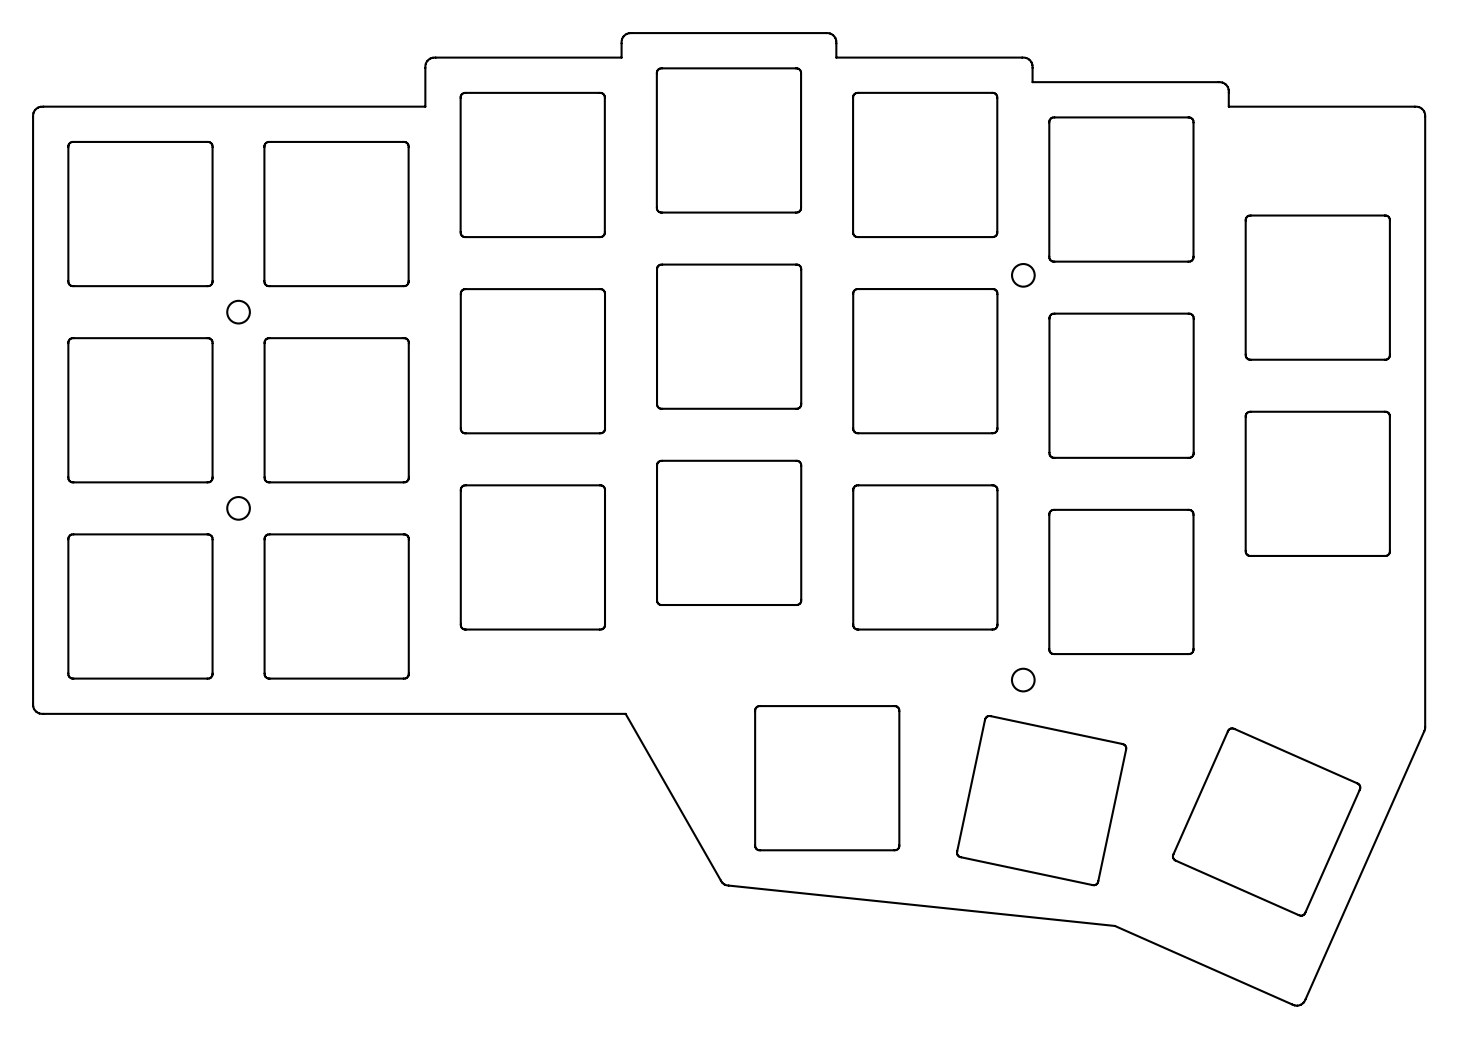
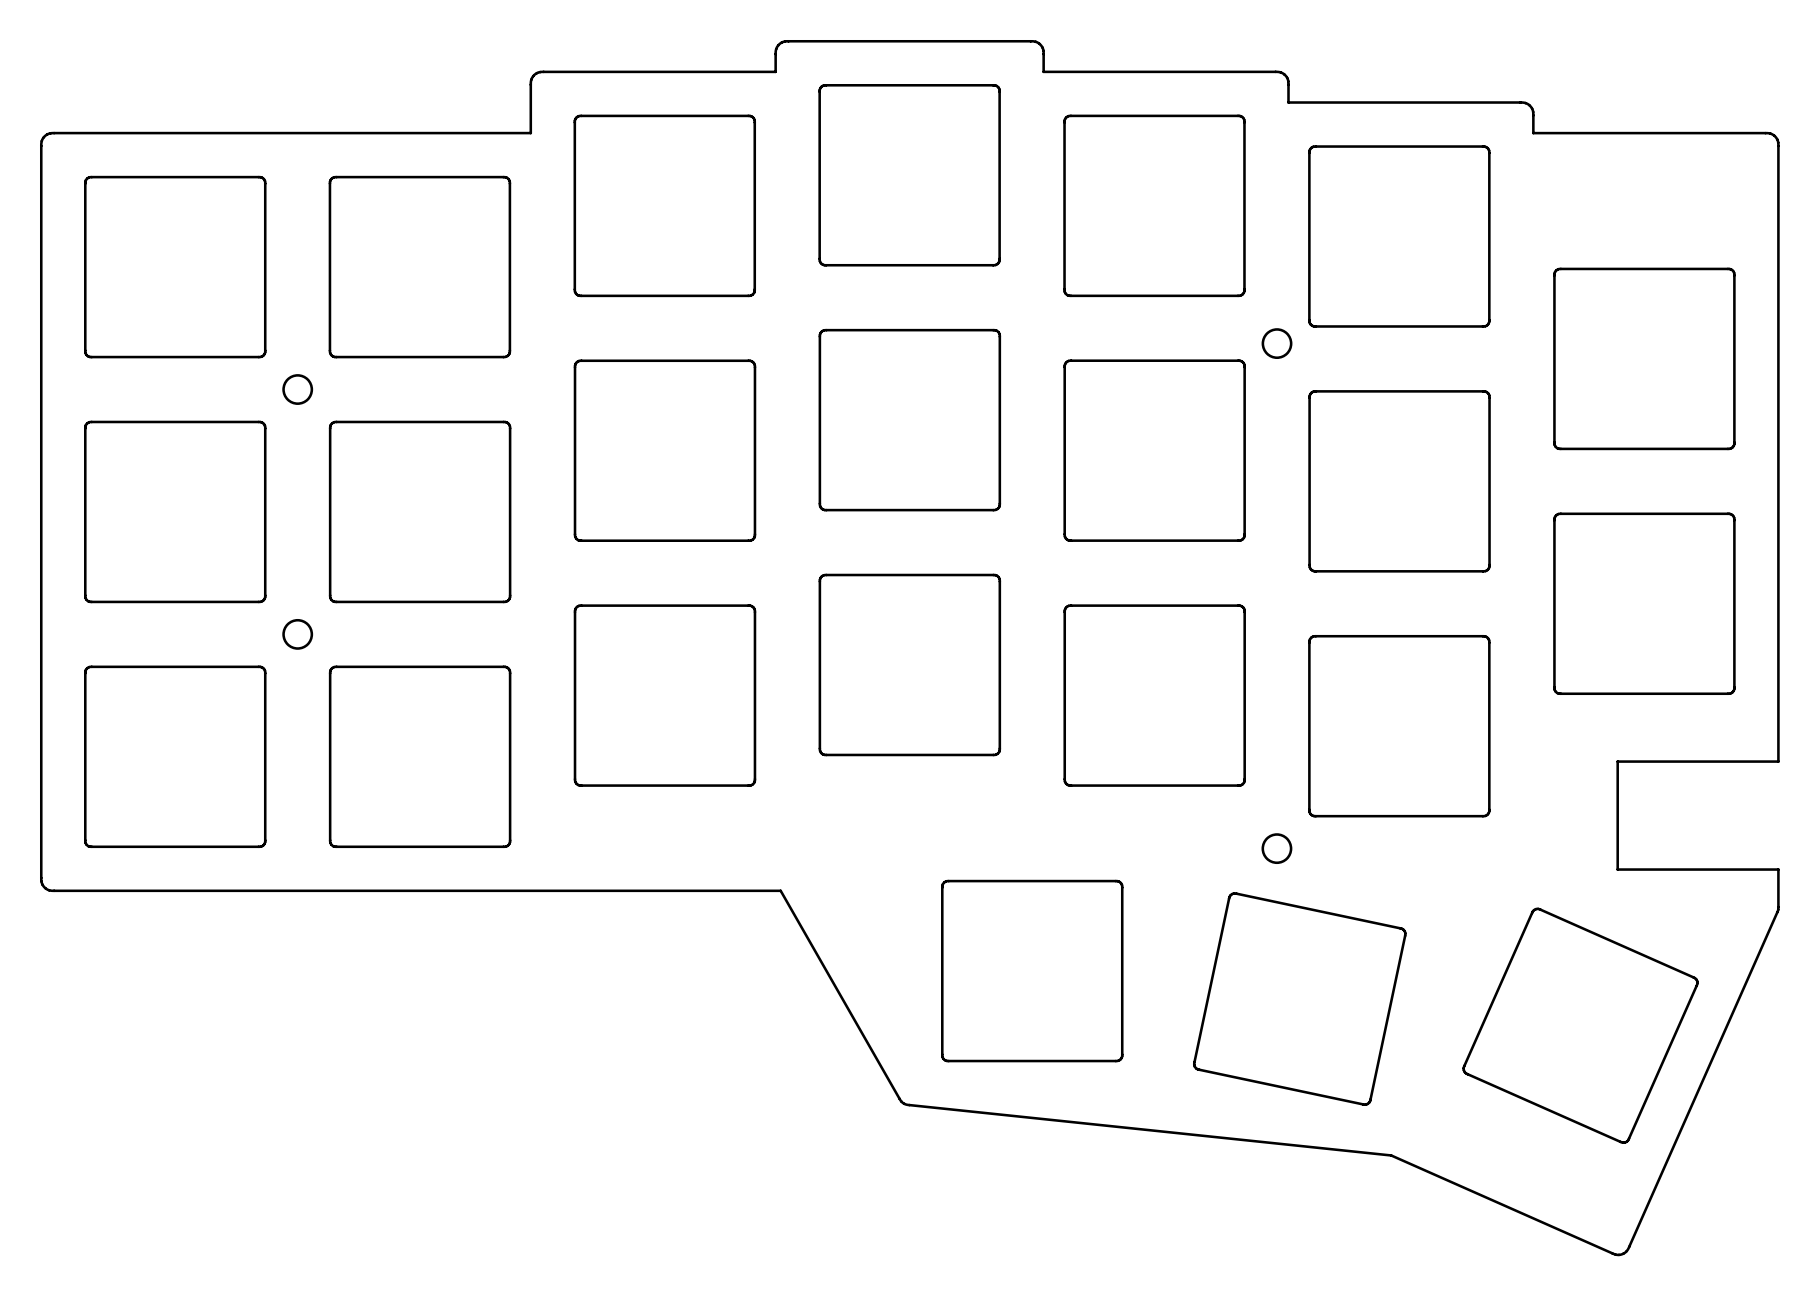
board edge: (1425, 610) (1425, 696) -> (1778, 761) (1617, 761) (1617, 869) (1778, 869)

